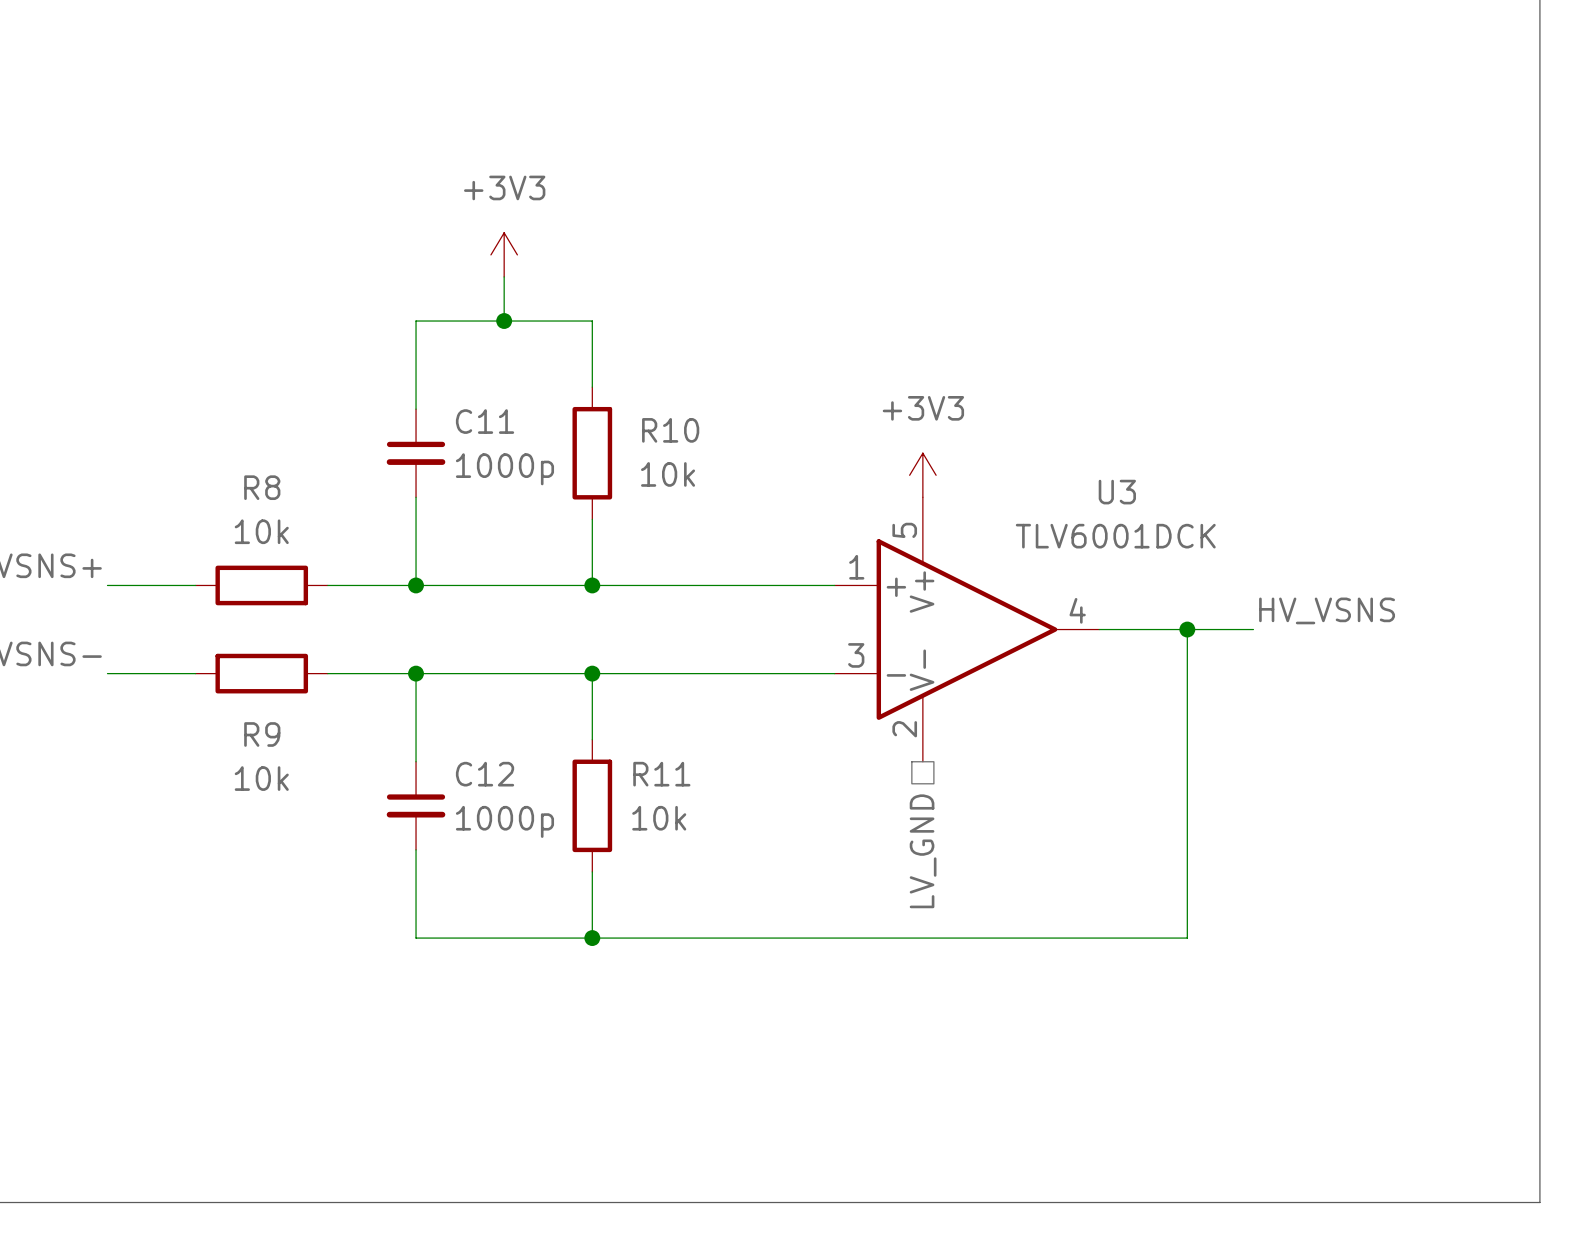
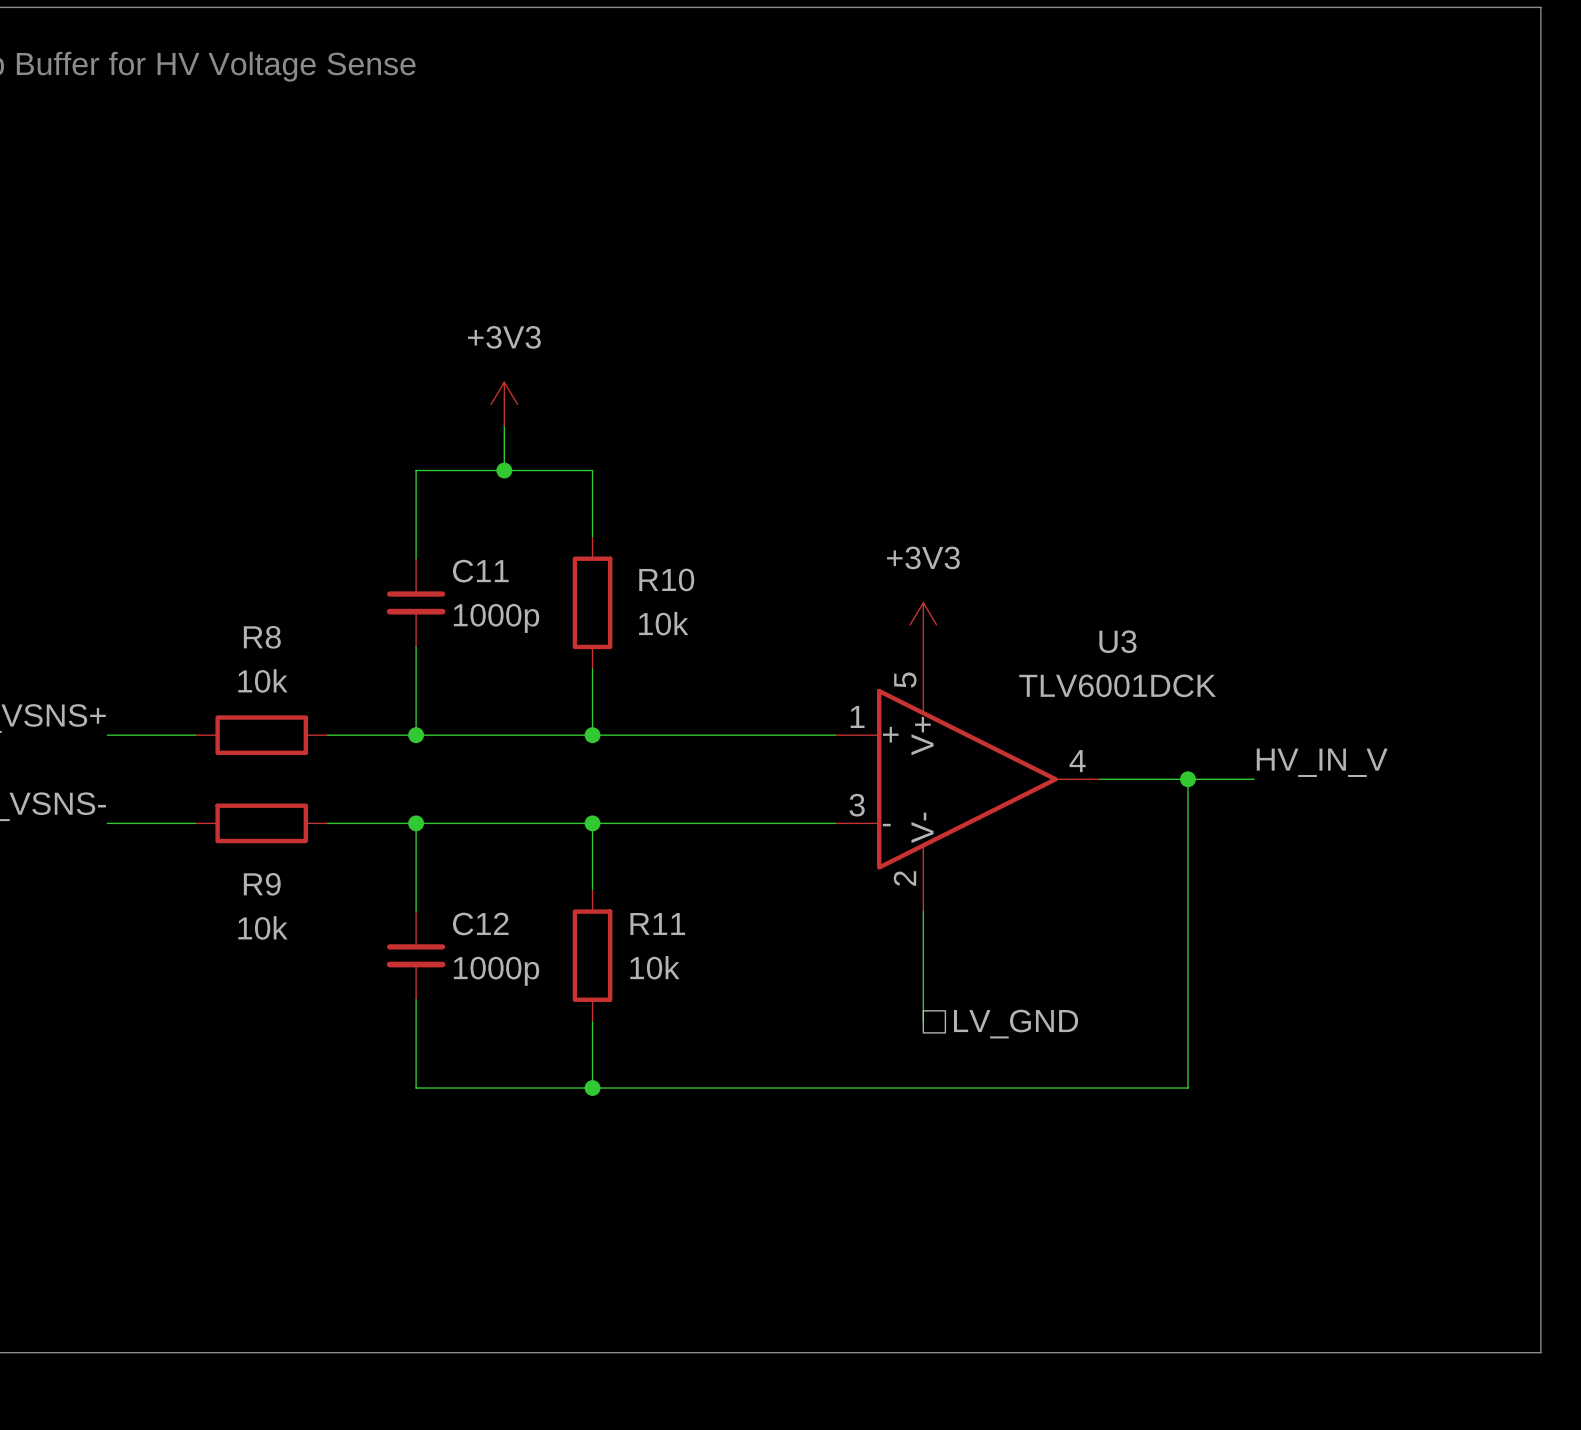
label: HV_VSNS (1327, 610) -> HV_IN_V (1322, 762)
wire: none -> (923, 911) (923, 1021)
hierarchical label rotation: 0° (923, 851) -> 90° counterclockwise (1016, 1024)

